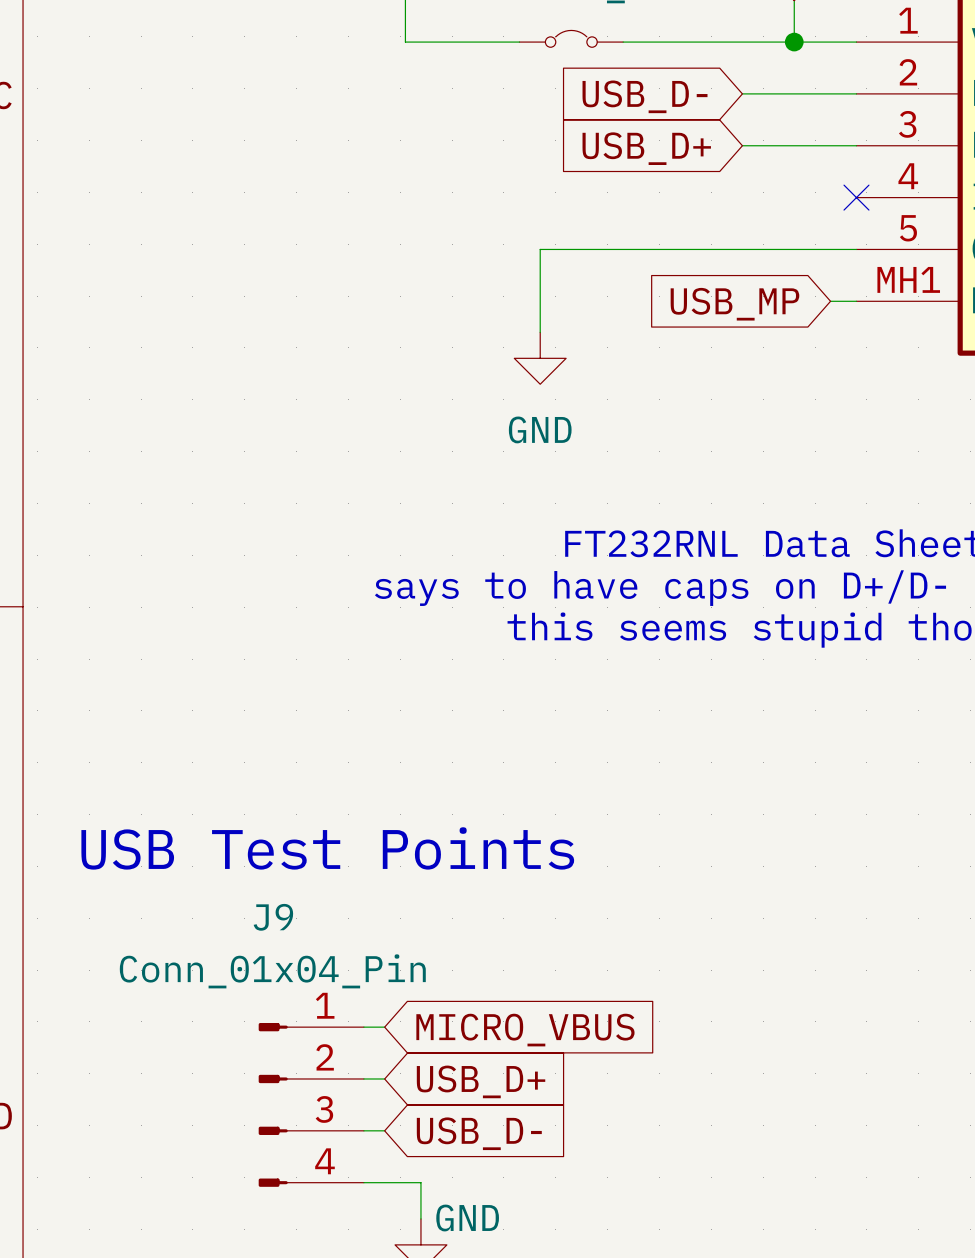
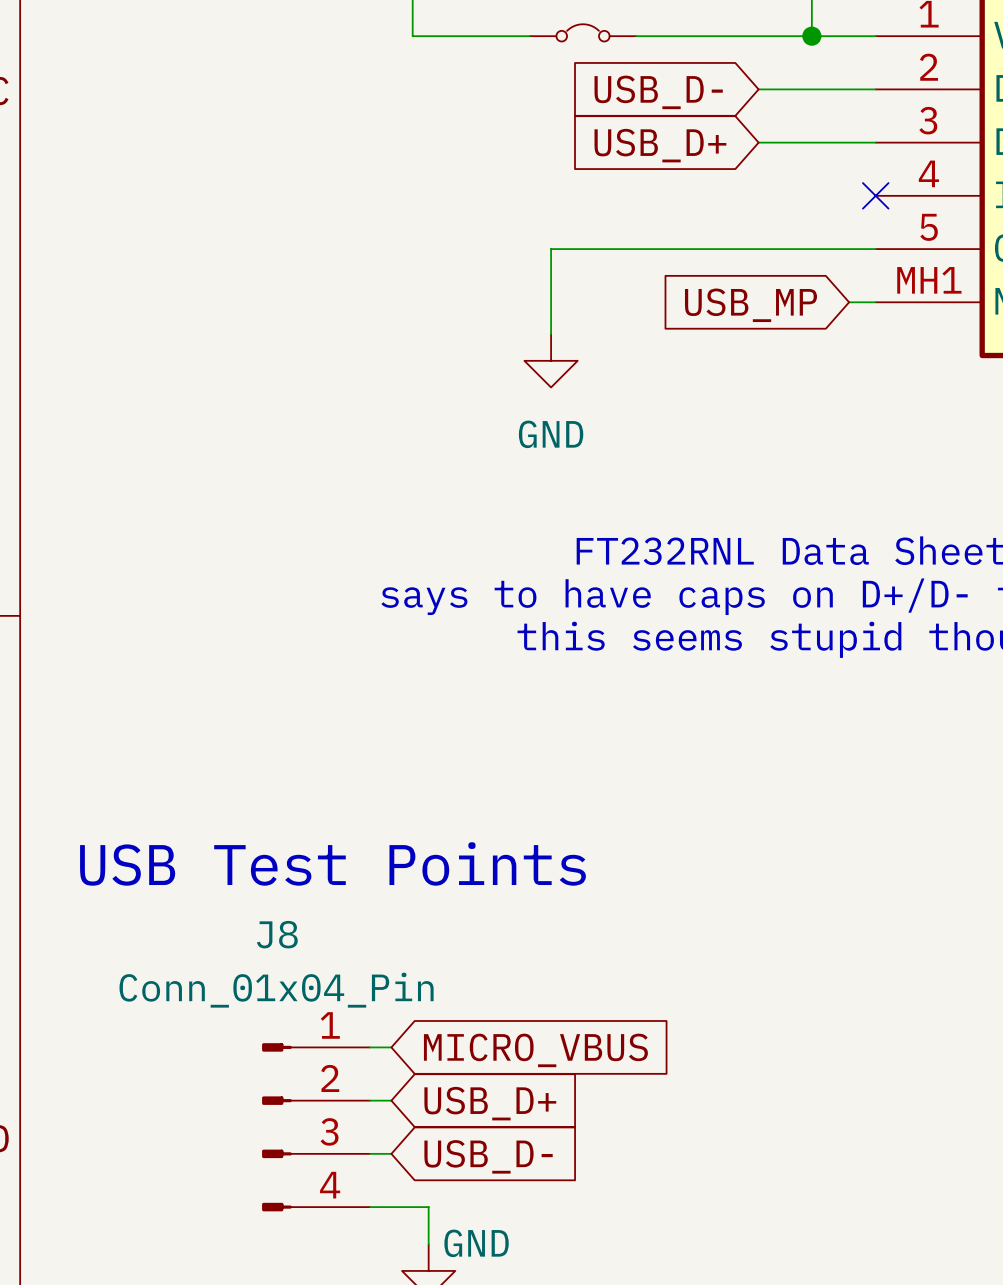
J9 name: J9 (273, 917) -> J8 (277, 934)

